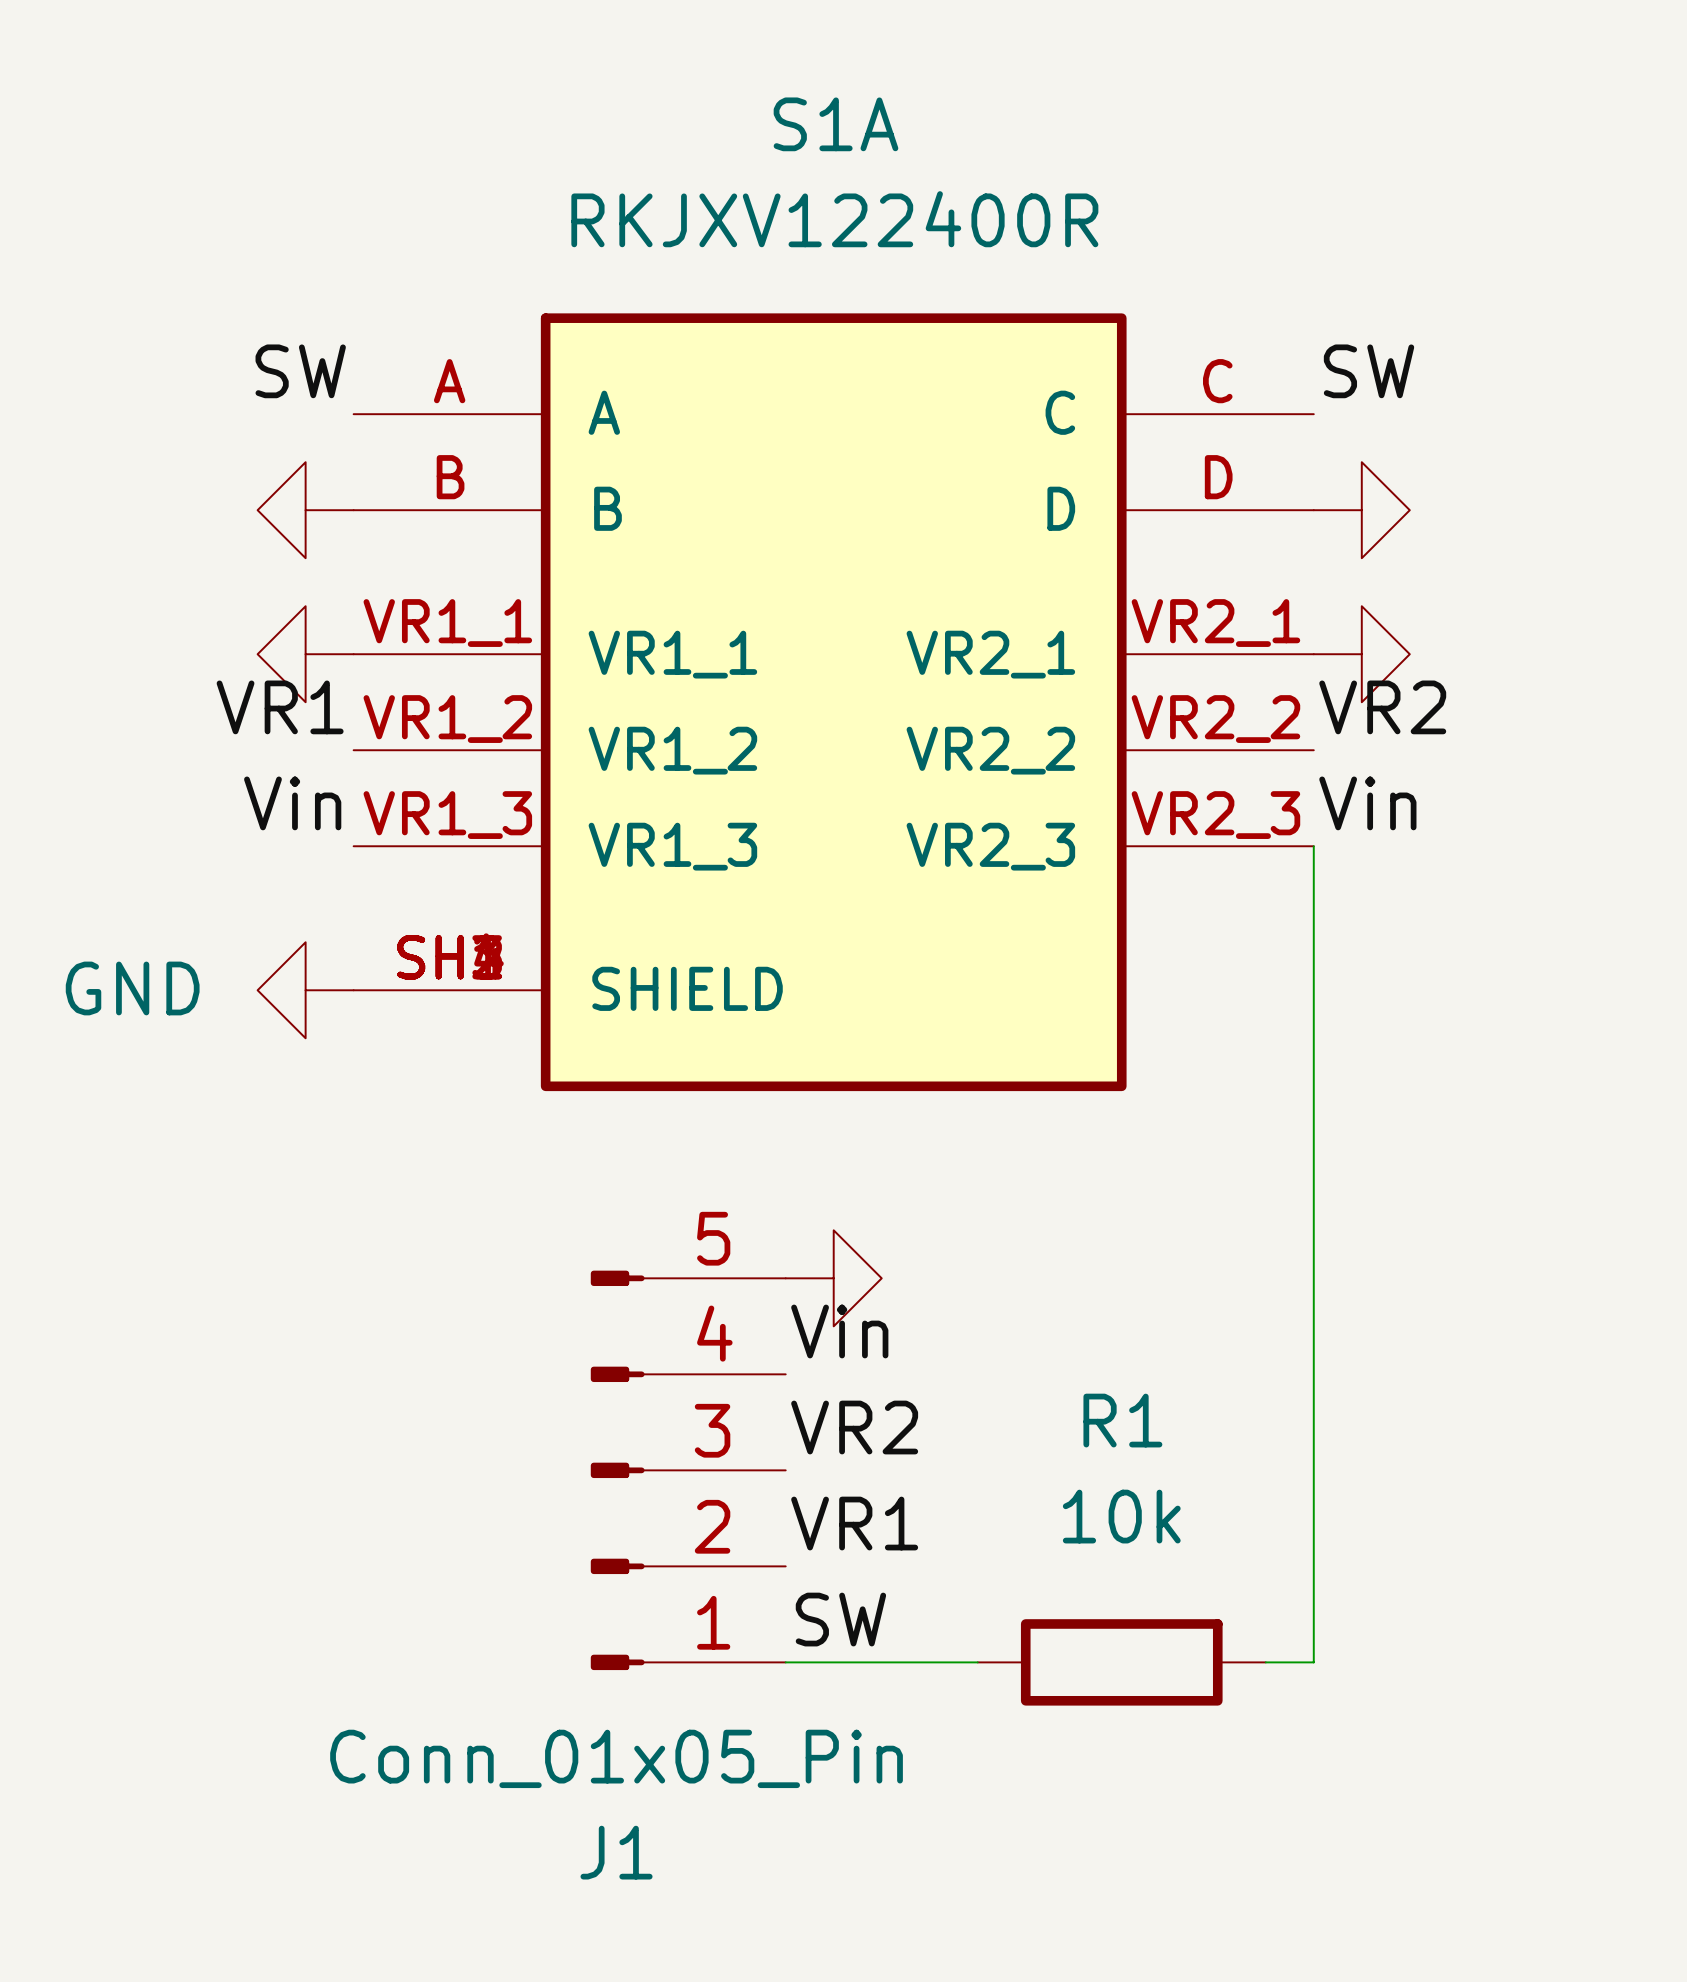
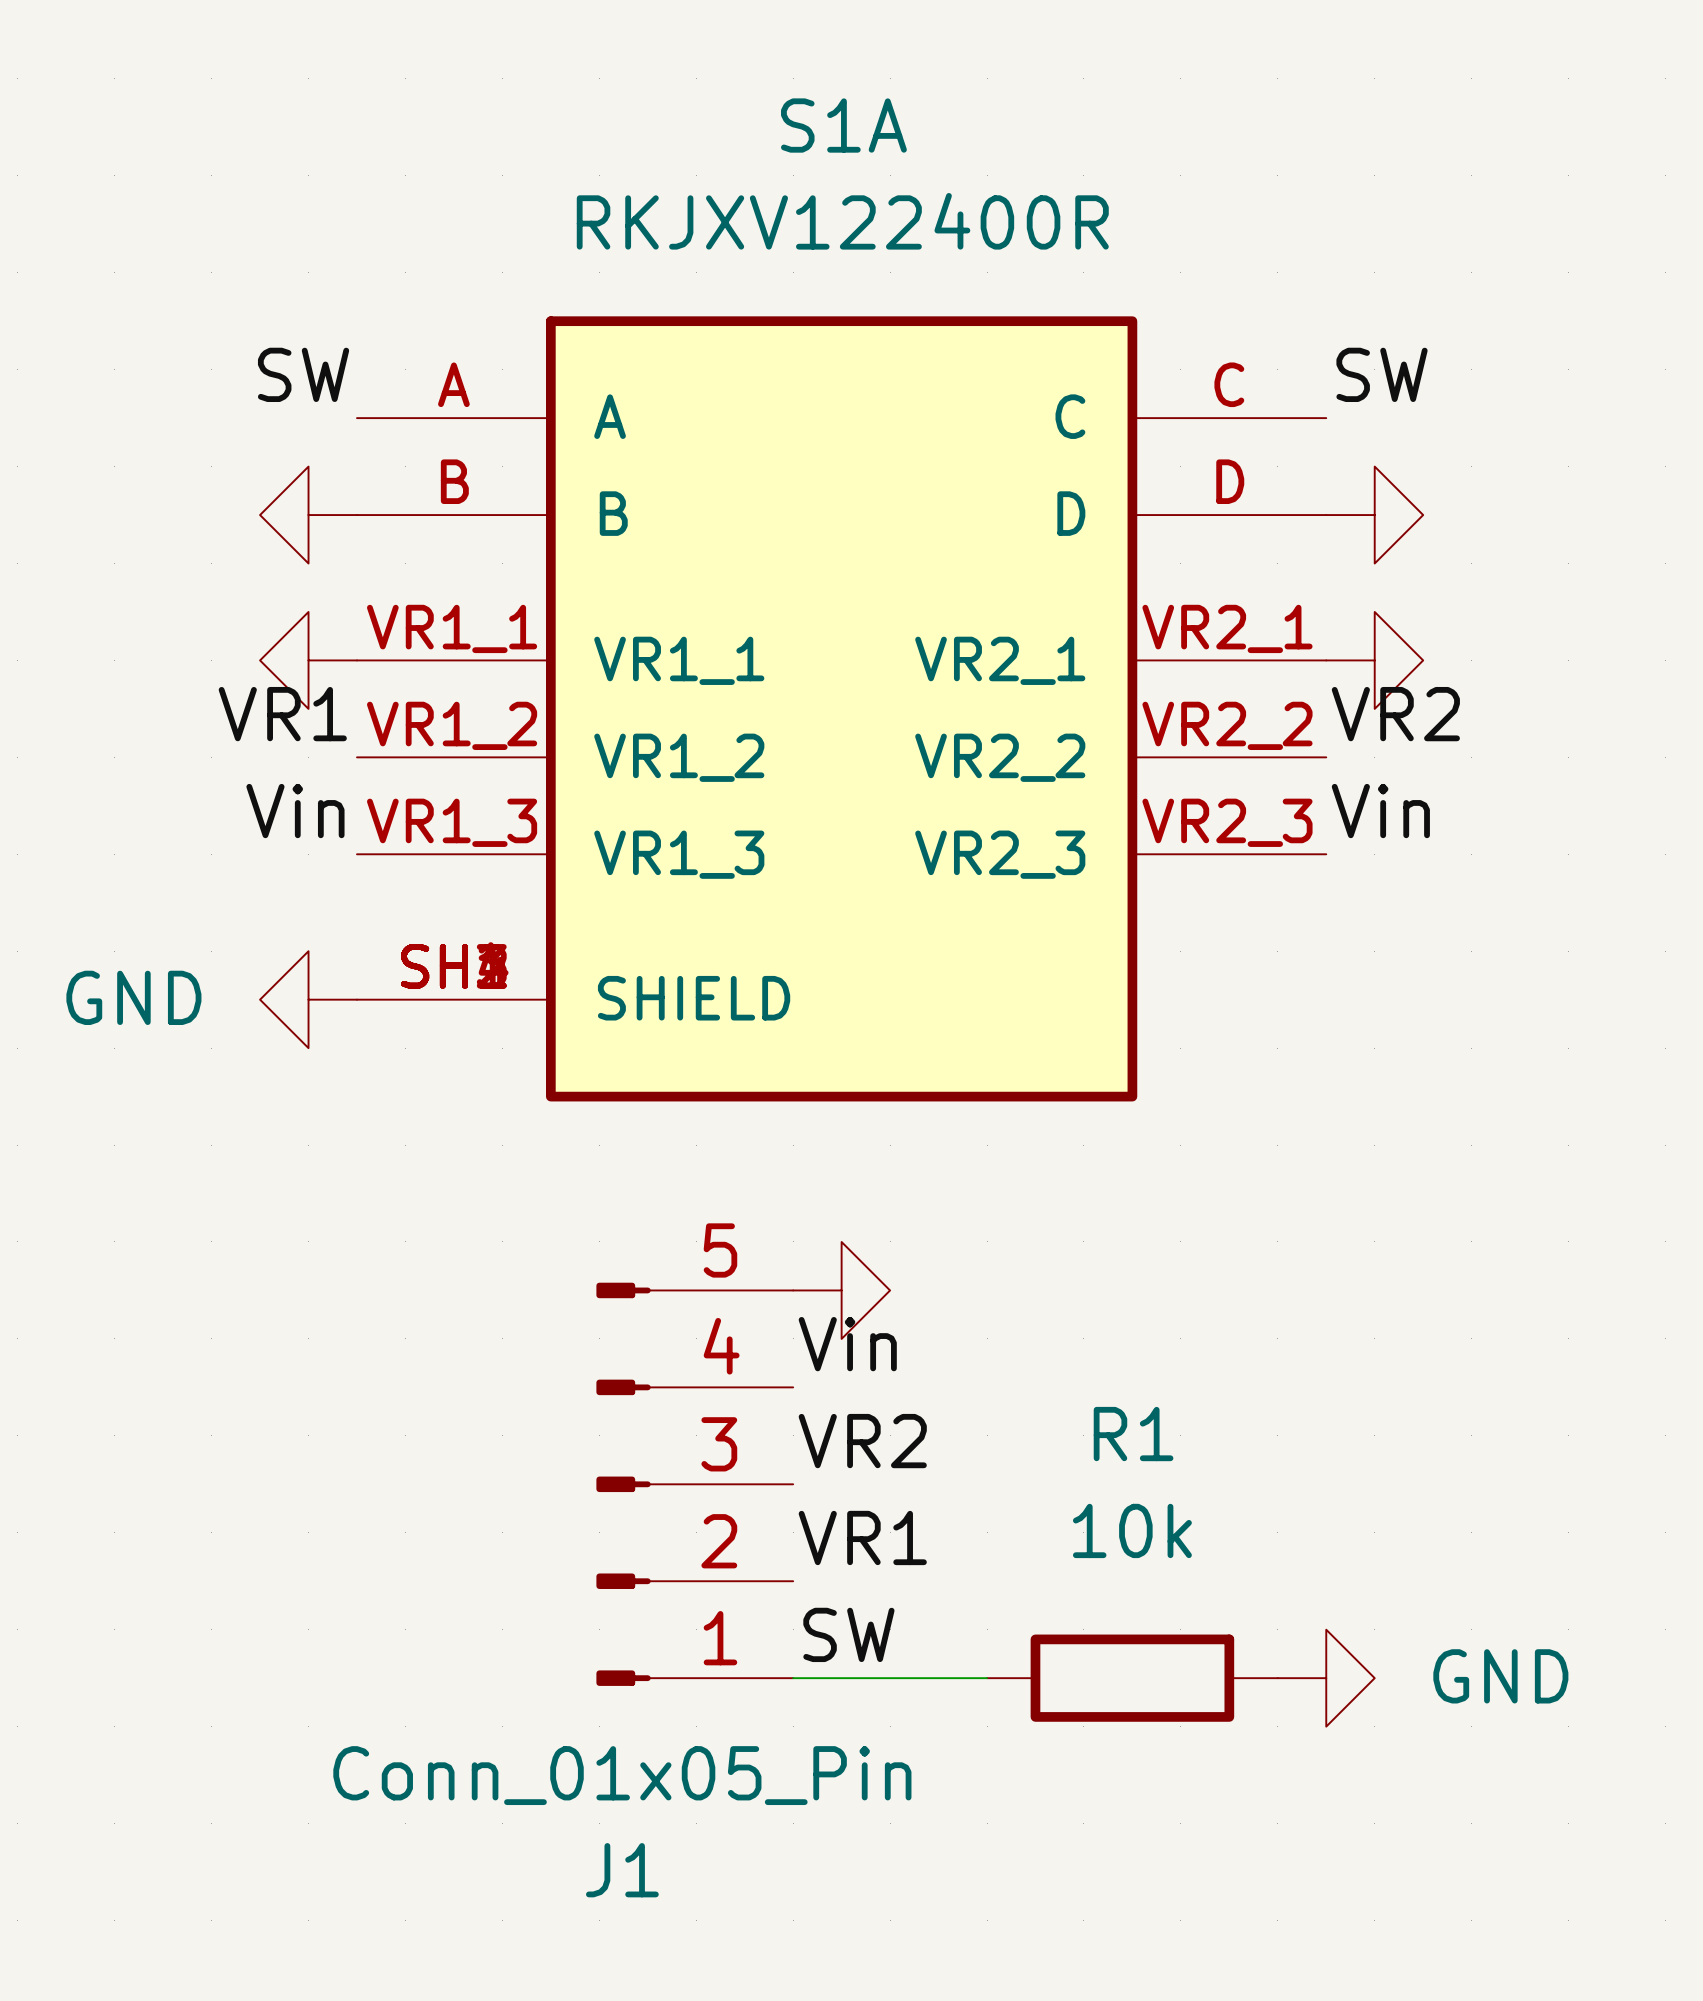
wire: (1313, 846) (1313, 1662) (1265, 1662) -> none
power symbol: none -> GND (1326, 1678)

